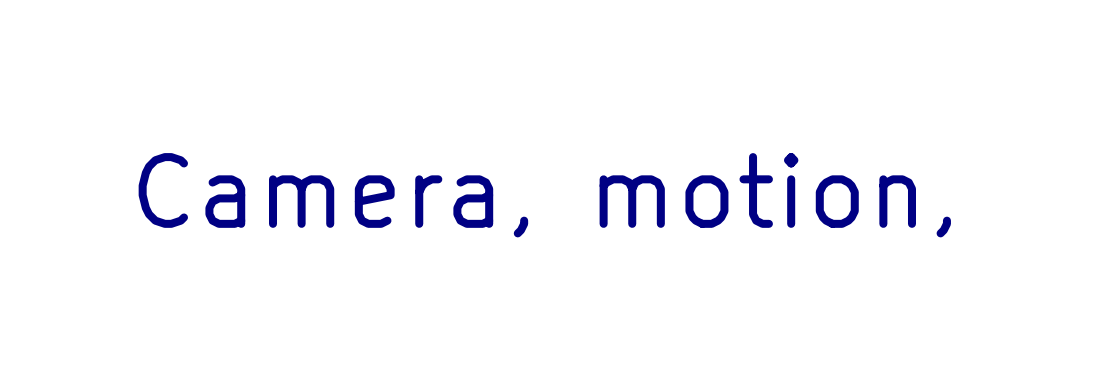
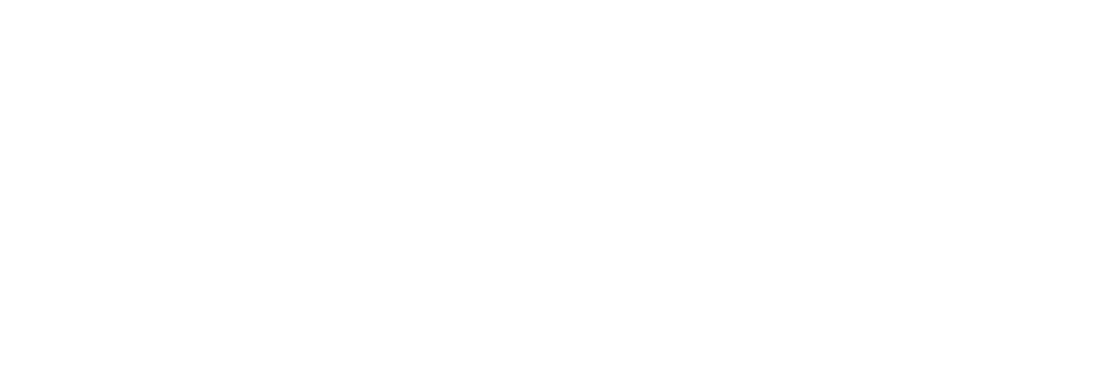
text: Camera, motion, (544, 195) -> none

